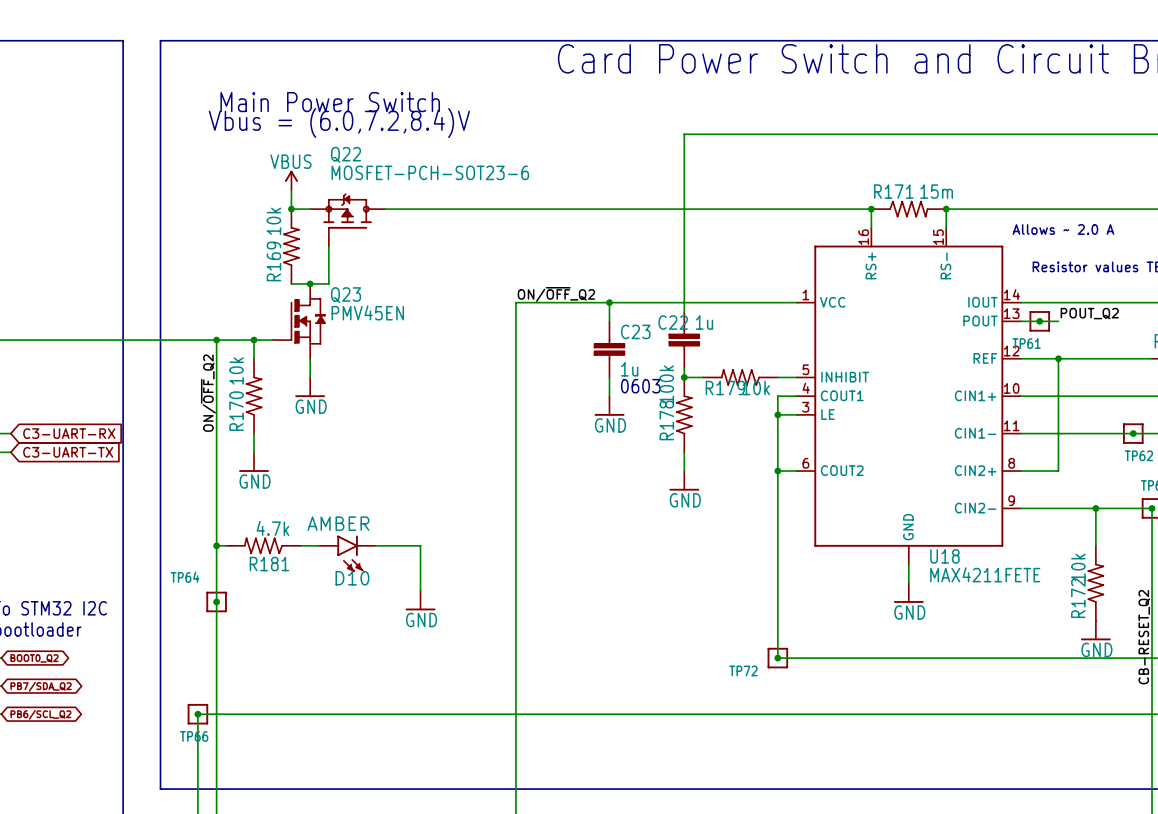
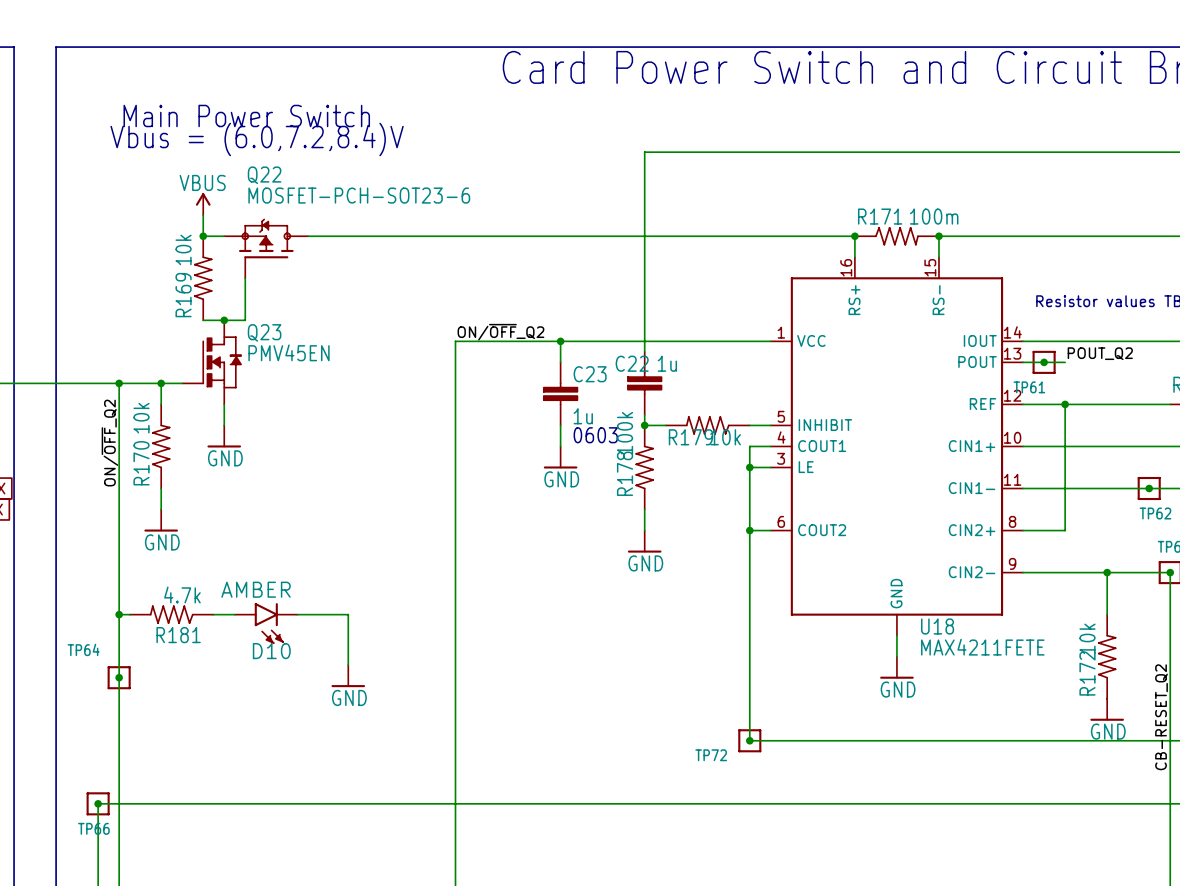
R171 value: 15m (936, 191) -> 100m (934, 216)
text: Allows ~ 2.0 A (1063, 229) -> none

